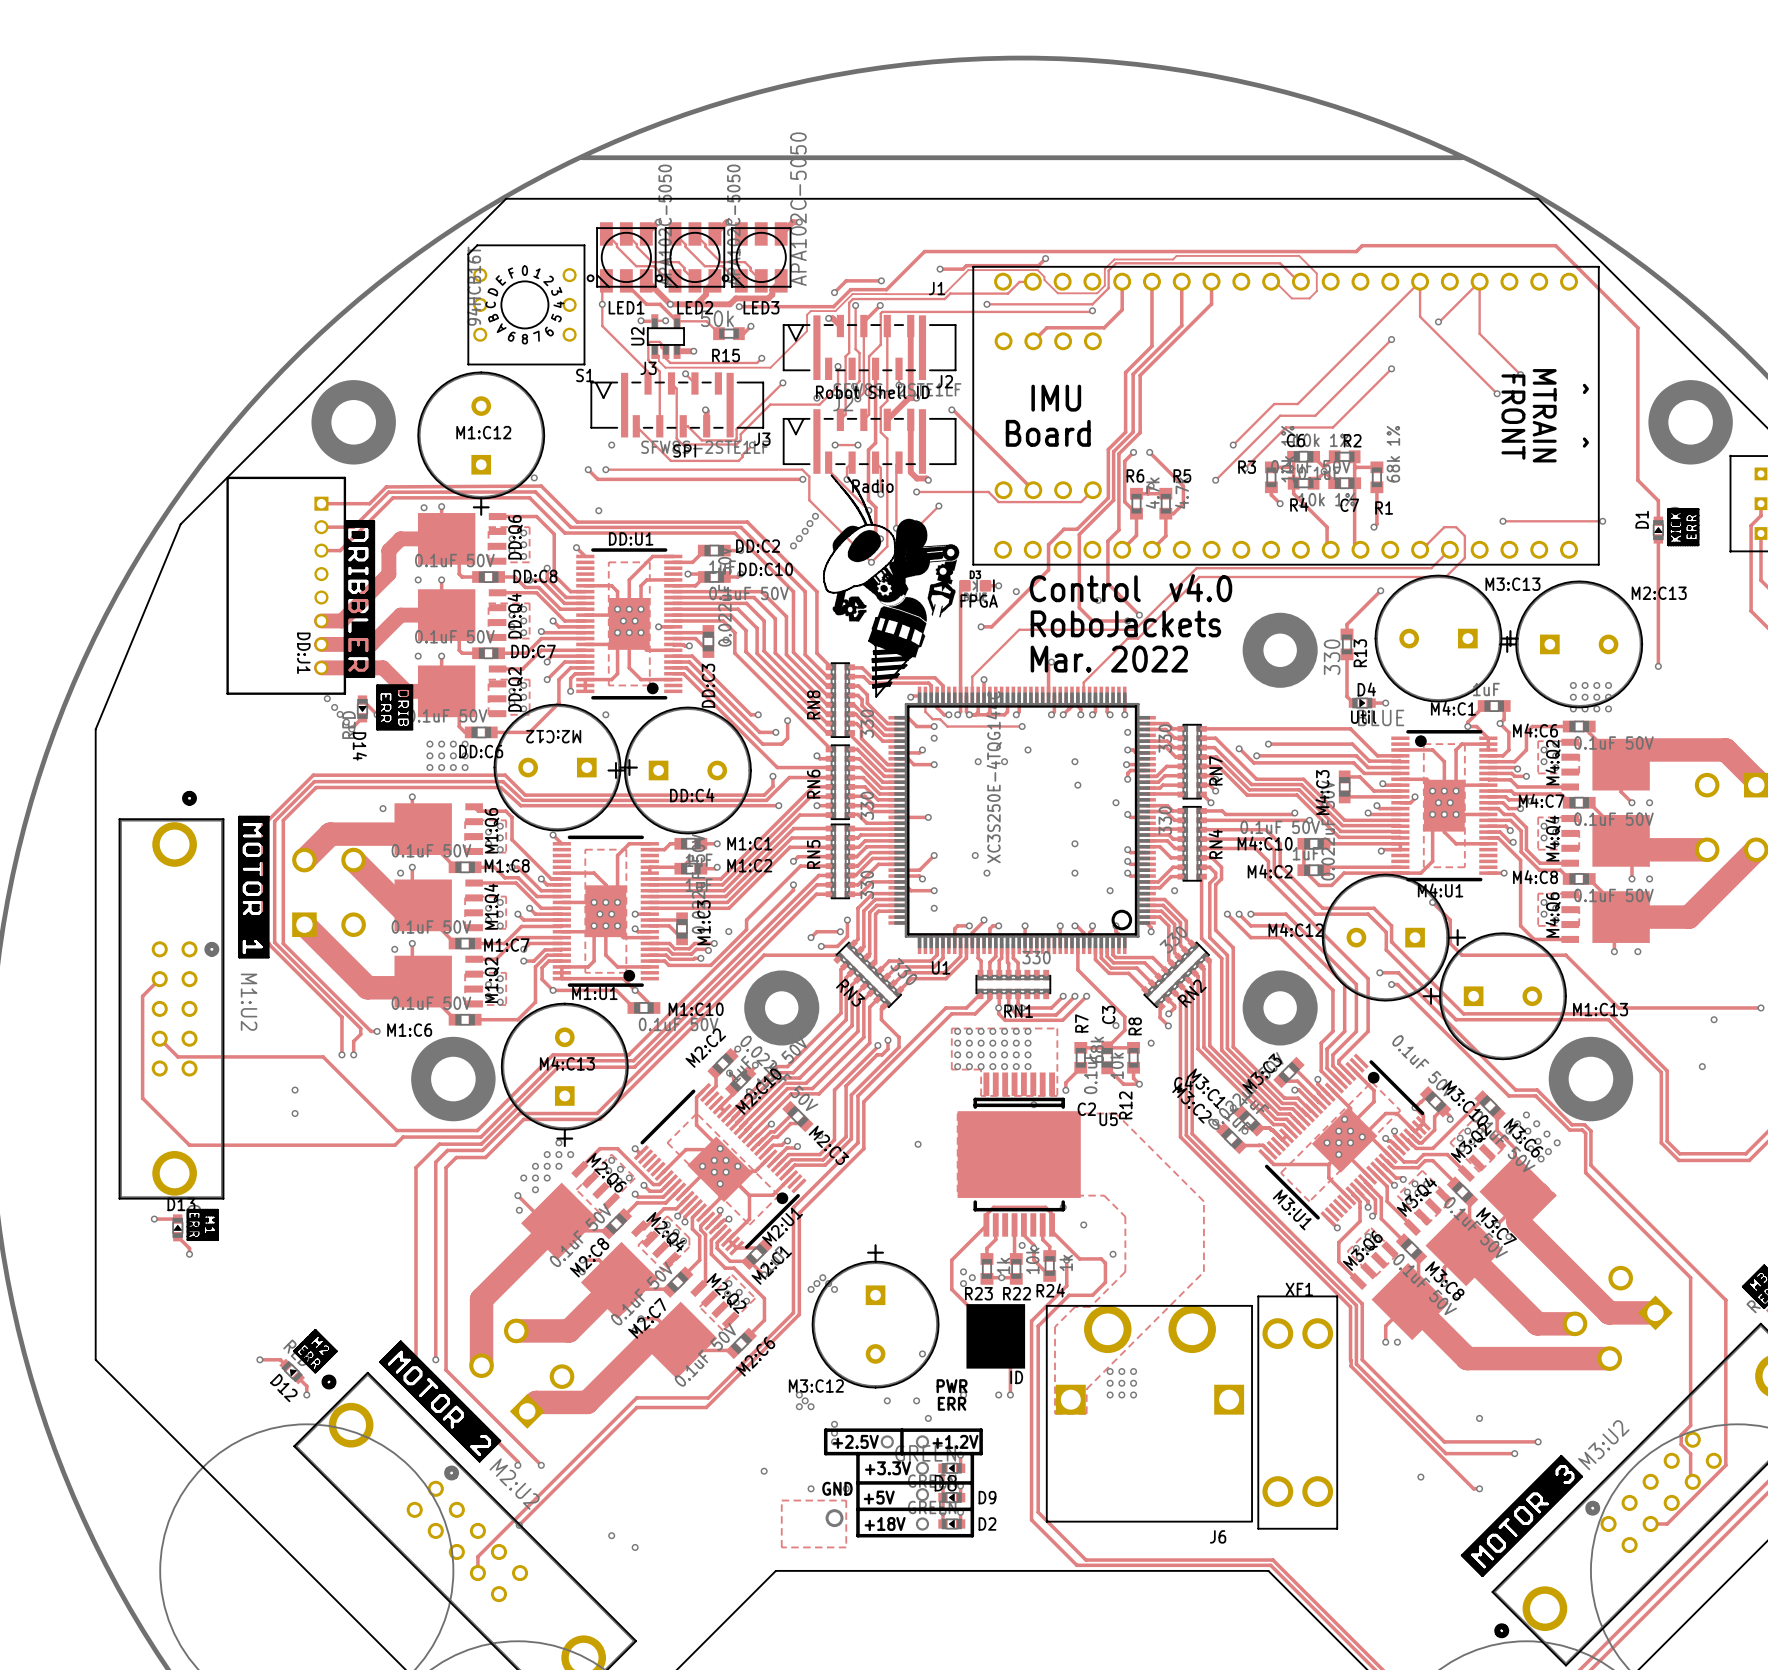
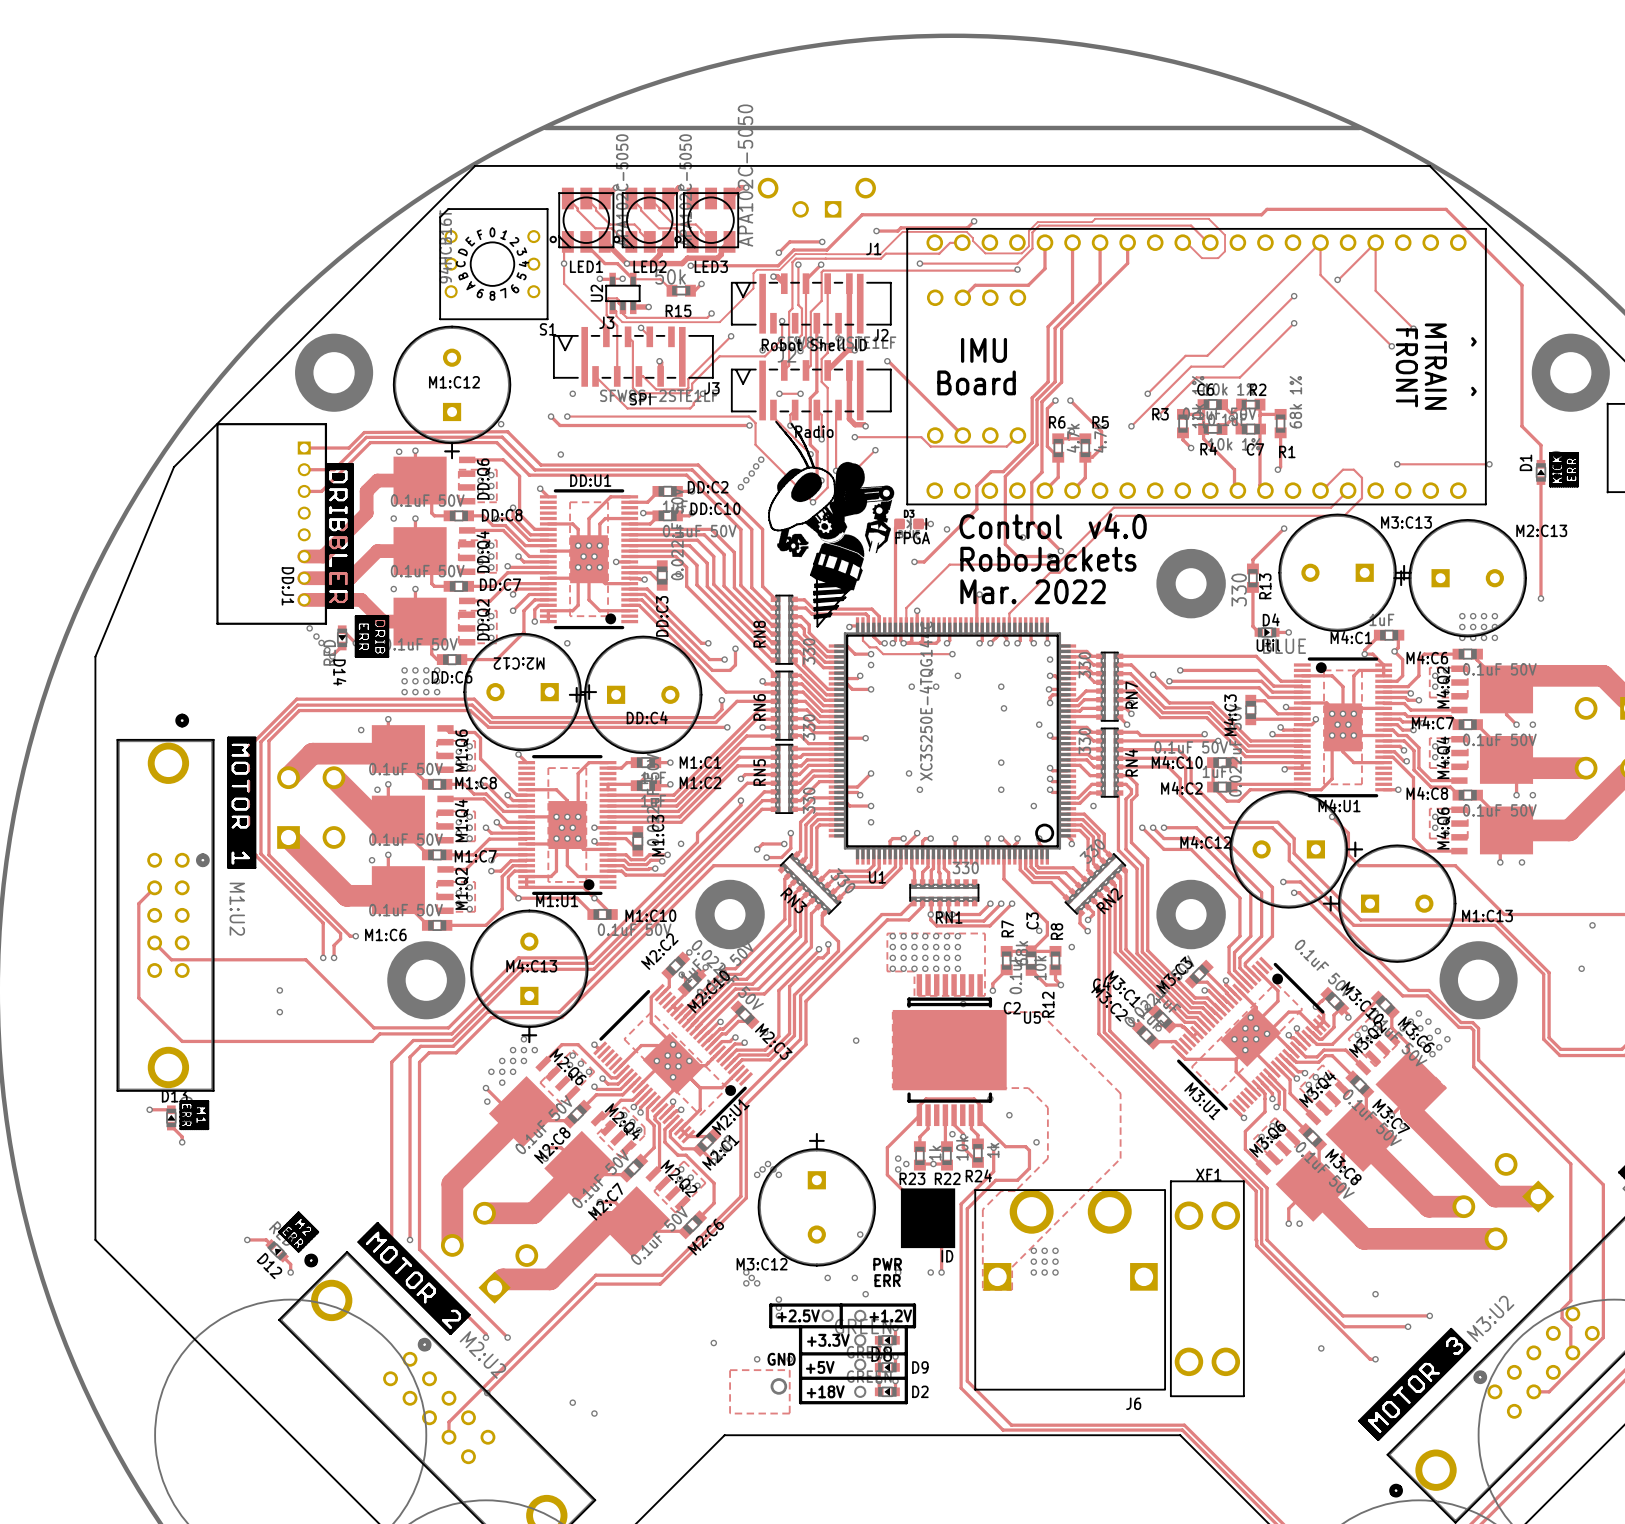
part: none -> (816, 197)

